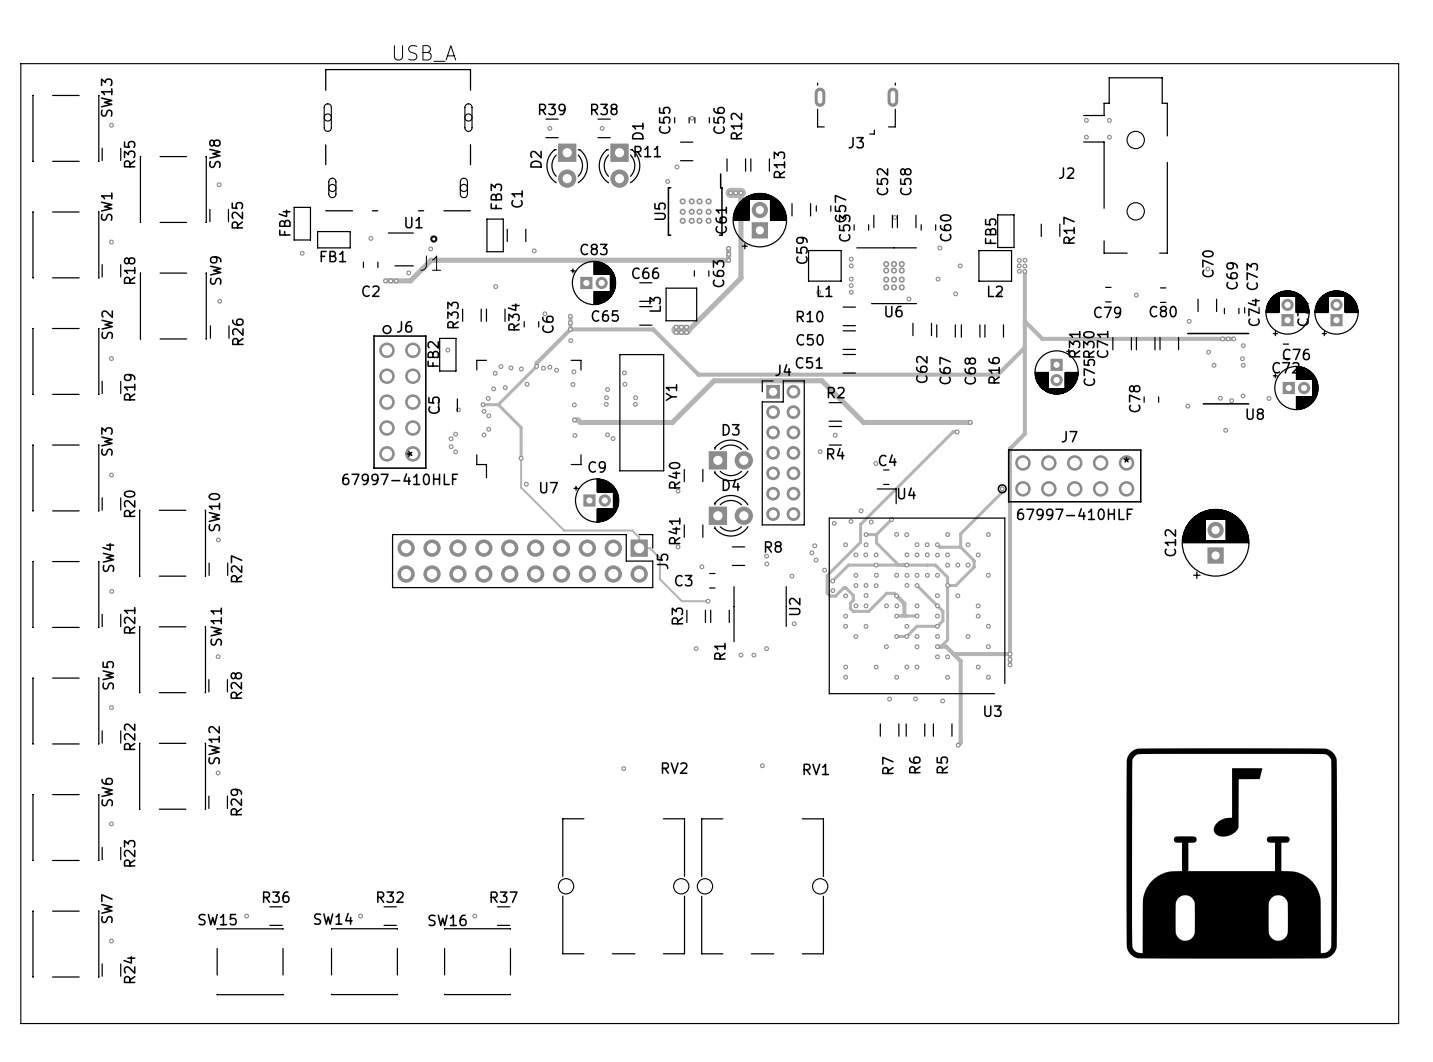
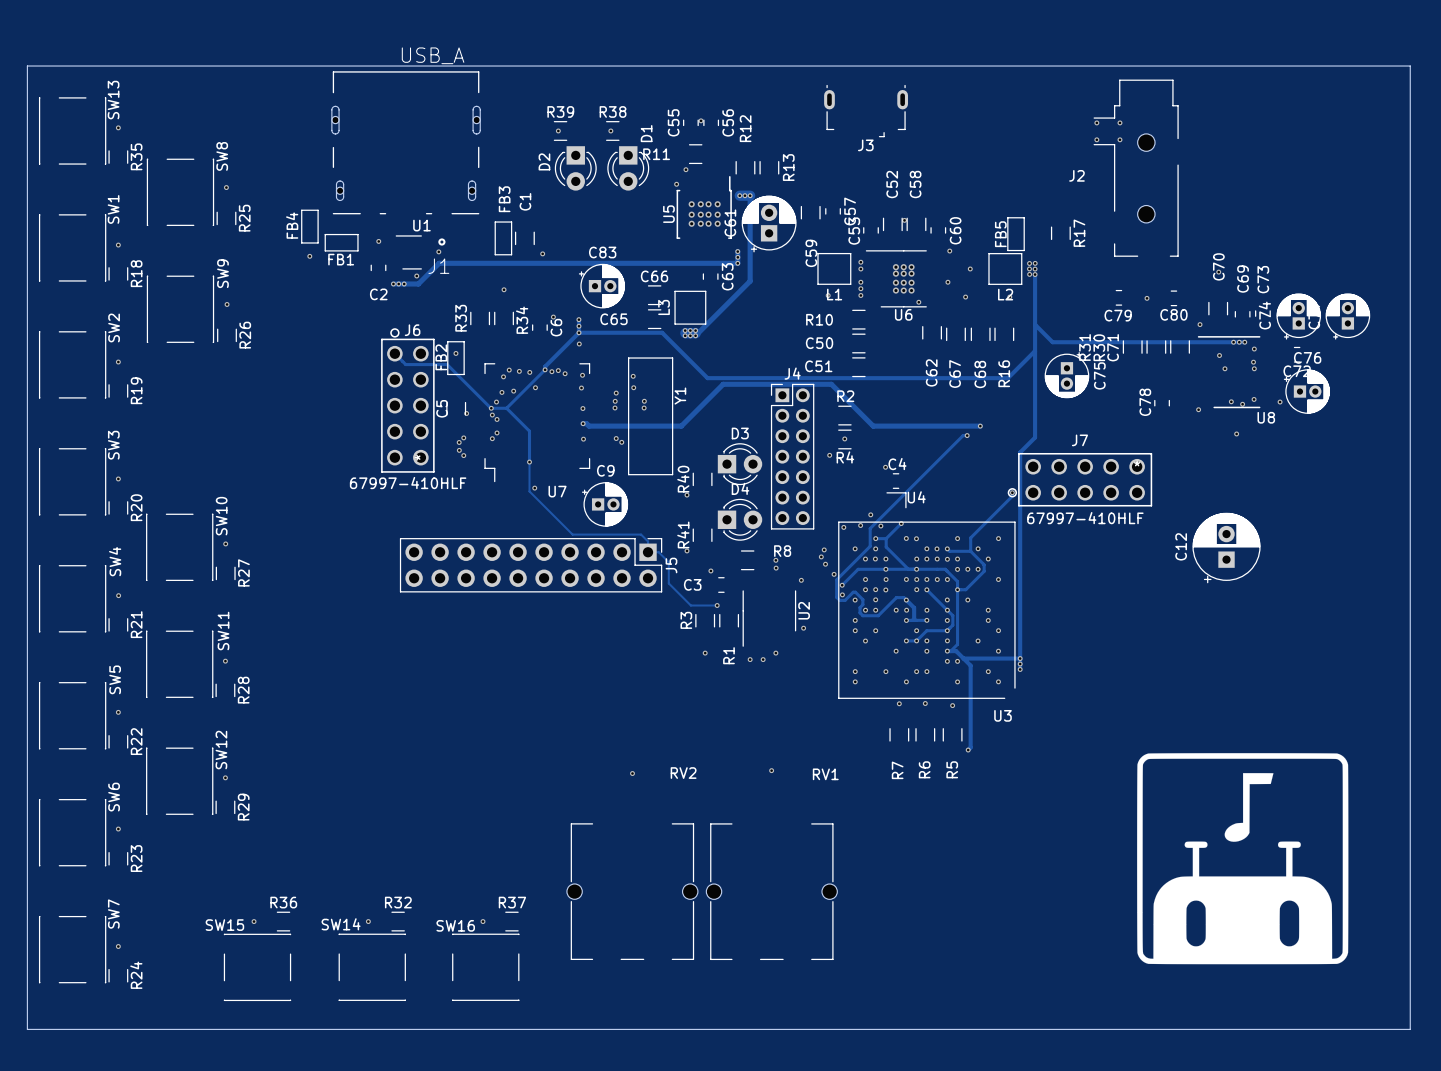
track: none -> (394, 353) (405, 364) (447, 364) (491, 408)

